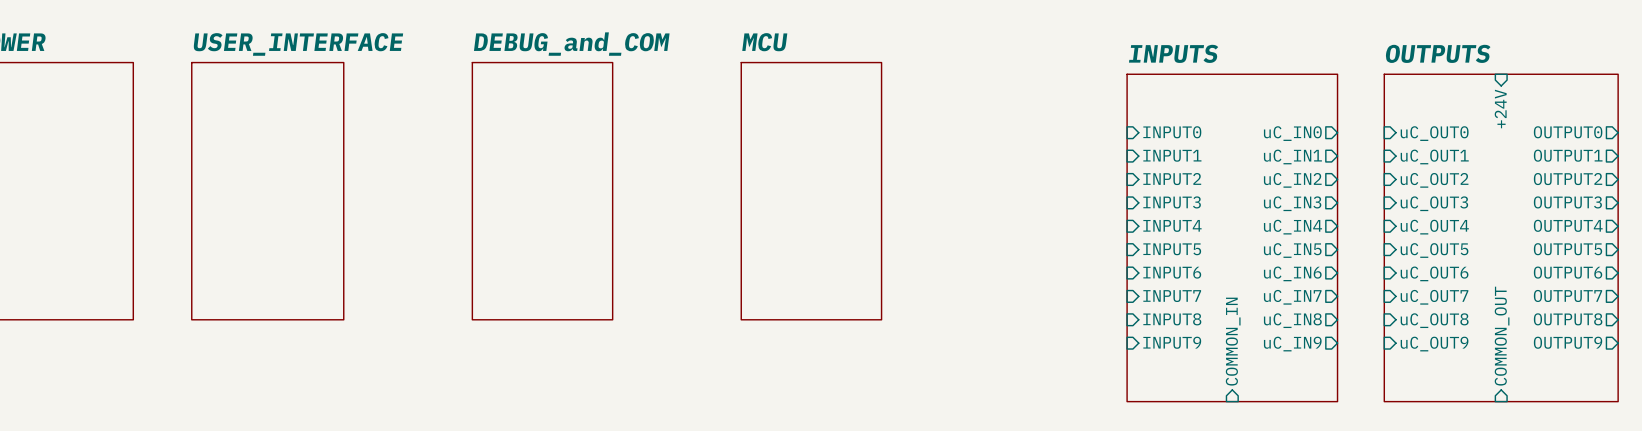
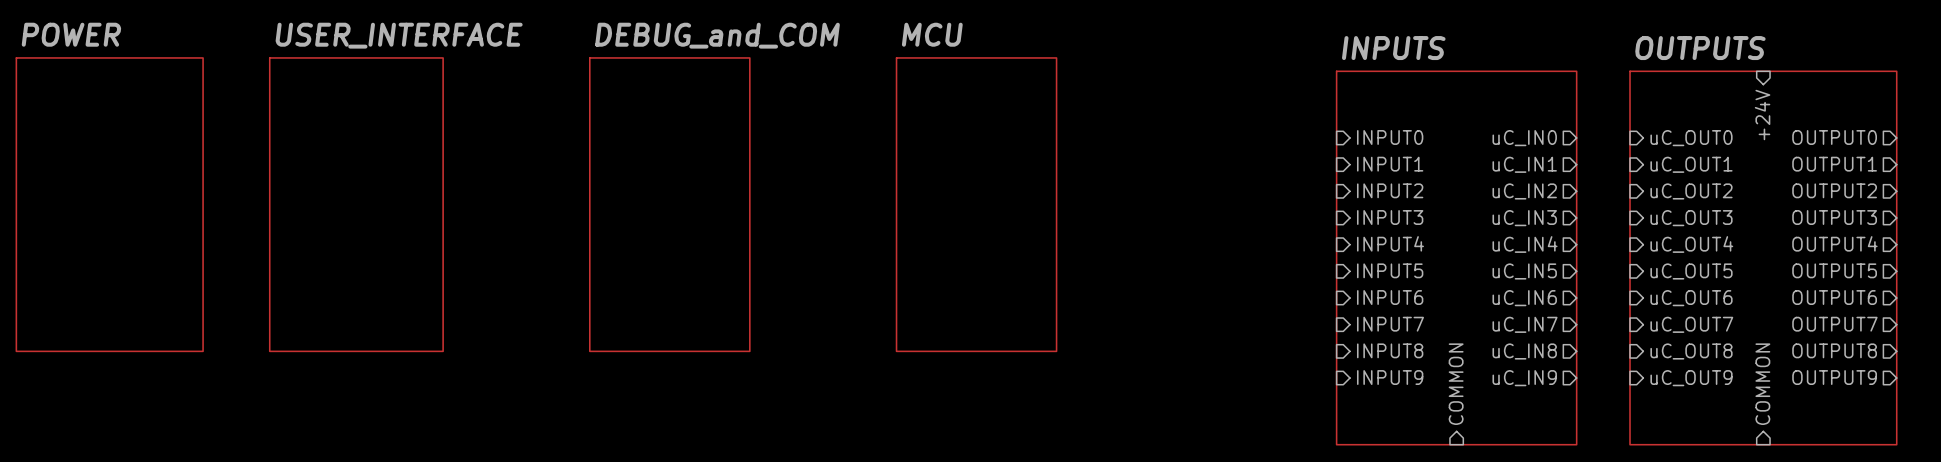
sheet pin: COMMON_OUT (1502, 336) -> COMMON (1762, 384)
sheet pin: COMMON_IN (1233, 341) -> COMMON (1456, 384)

